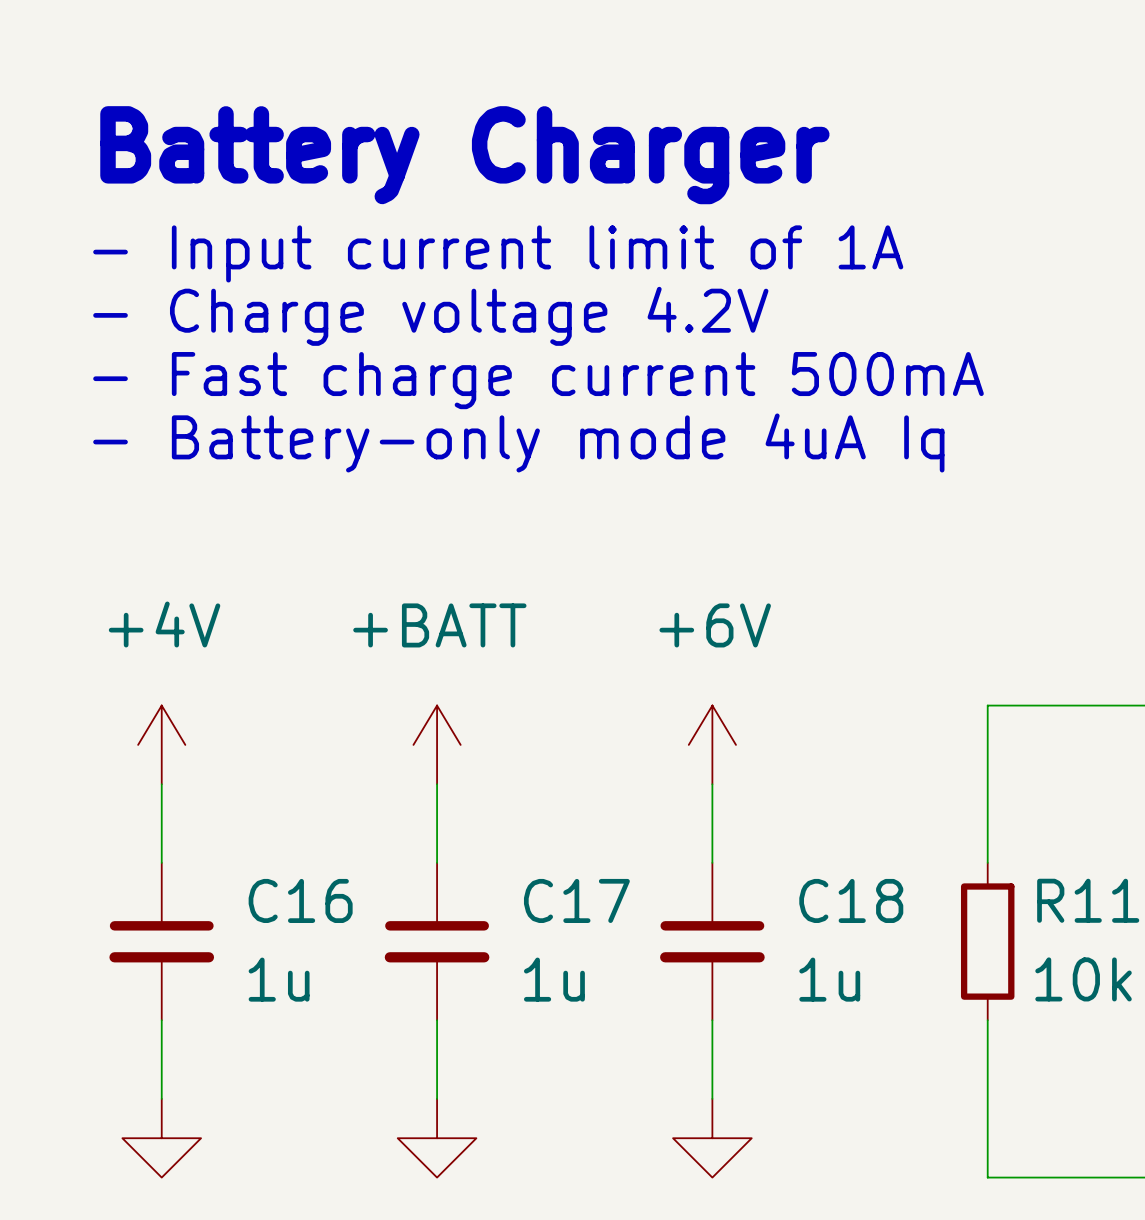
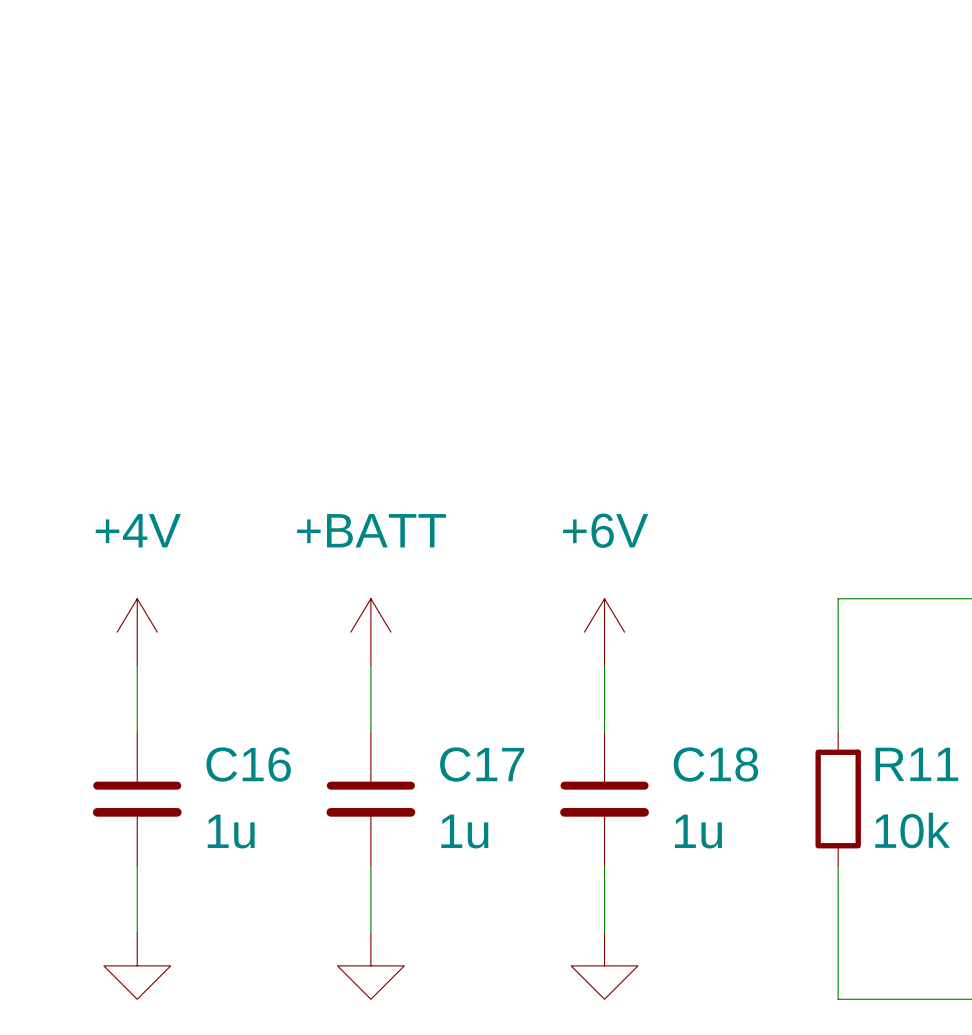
text: Battery Charger (464, 155) -> none
text: - Input current limit of 1A (498, 253) -> none
text: - Charge voltage 4.2V (430, 316) -> none
text: - Fast charge current 500mA (538, 380) -> none
text: - Battery-only mode 4uA Iq (518, 442) -> none

